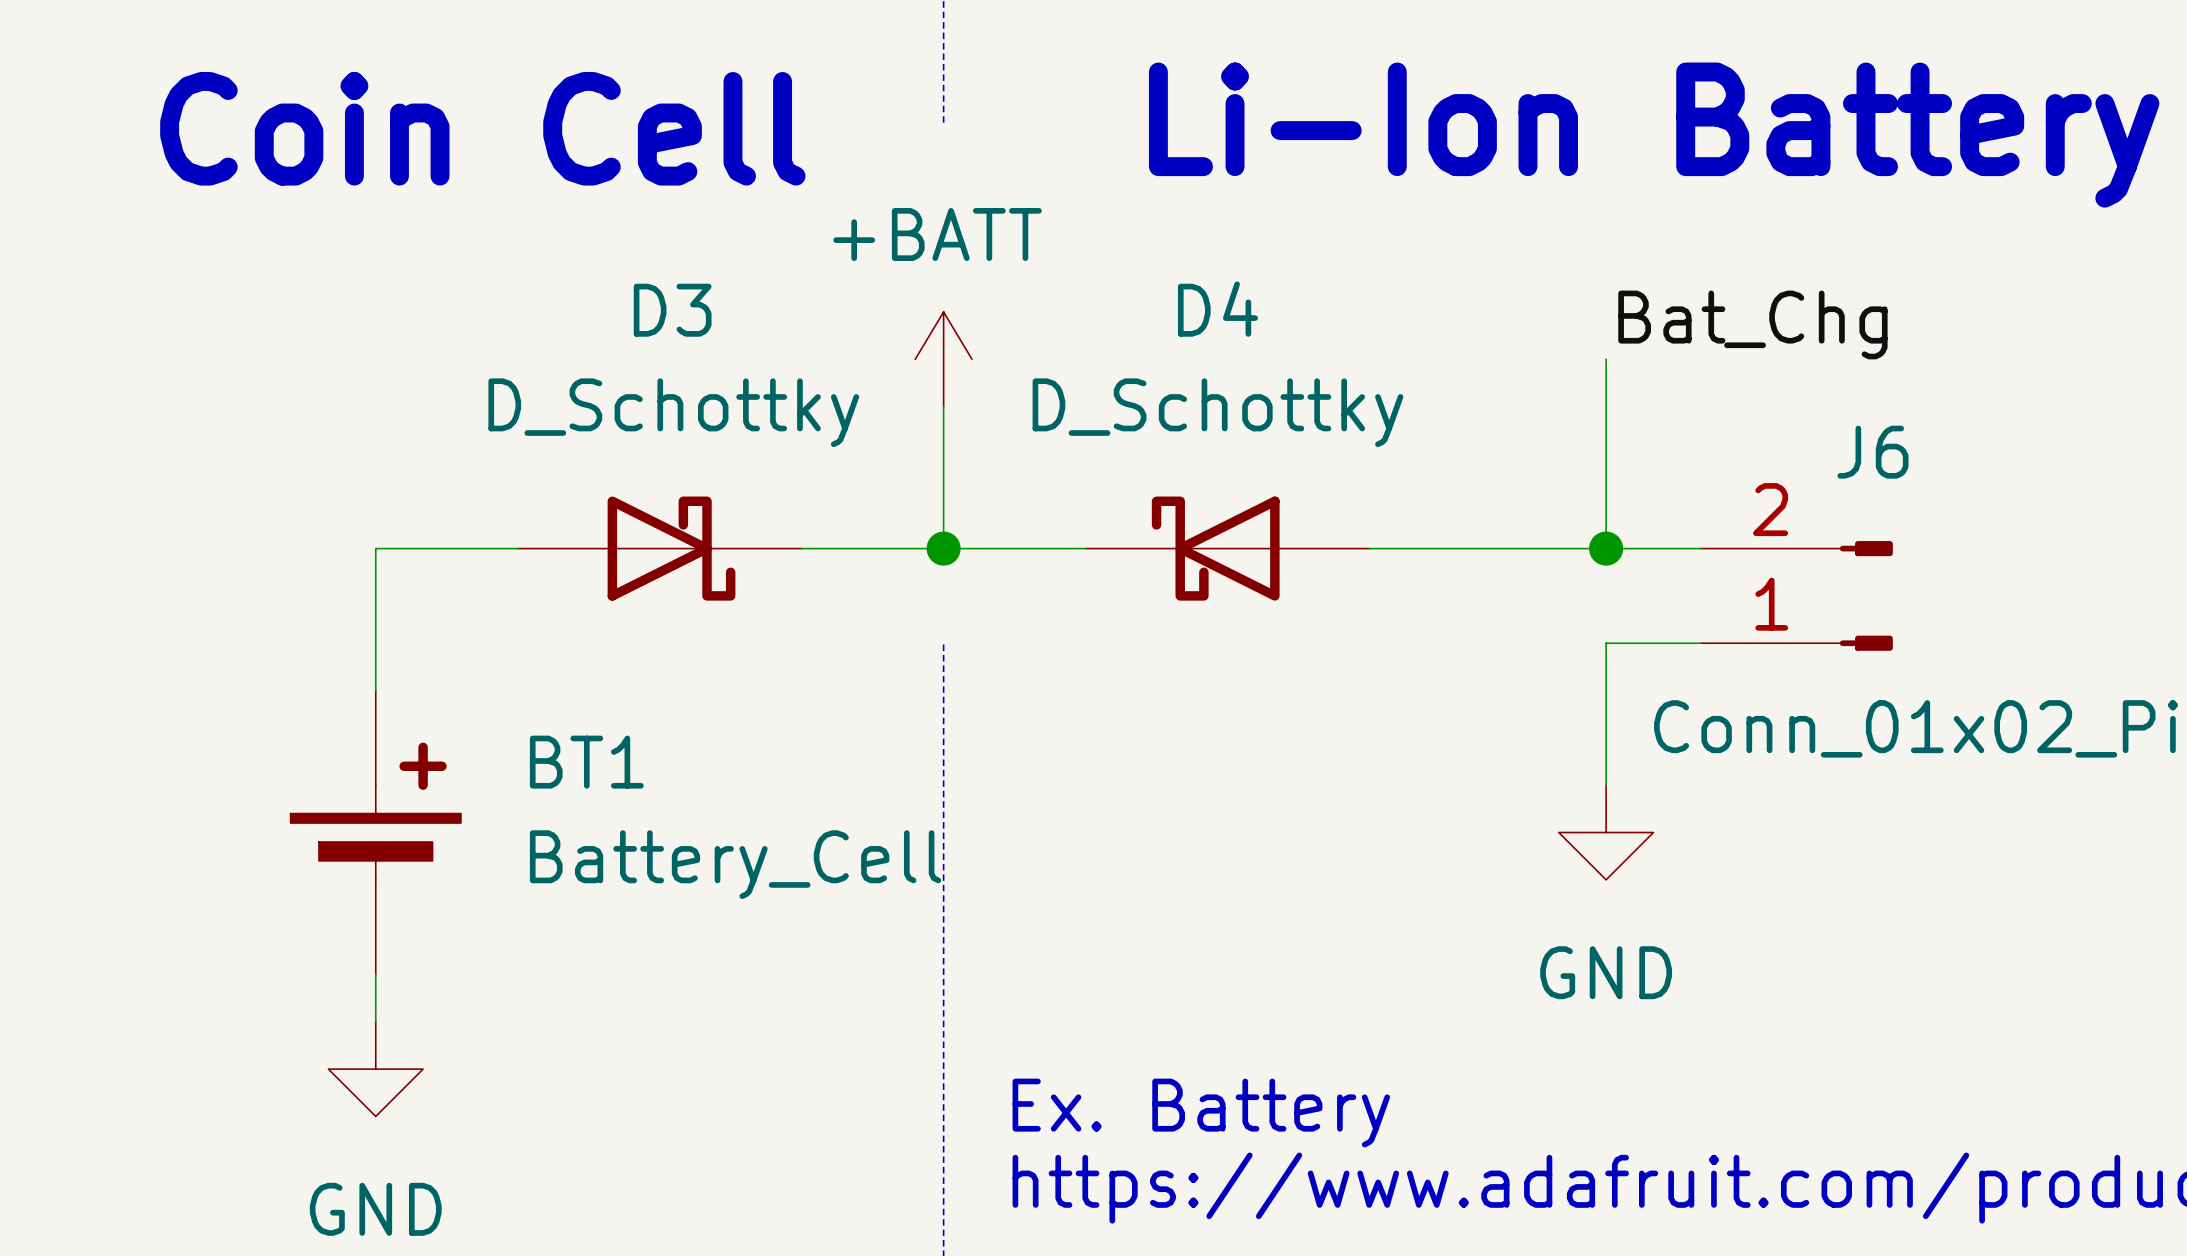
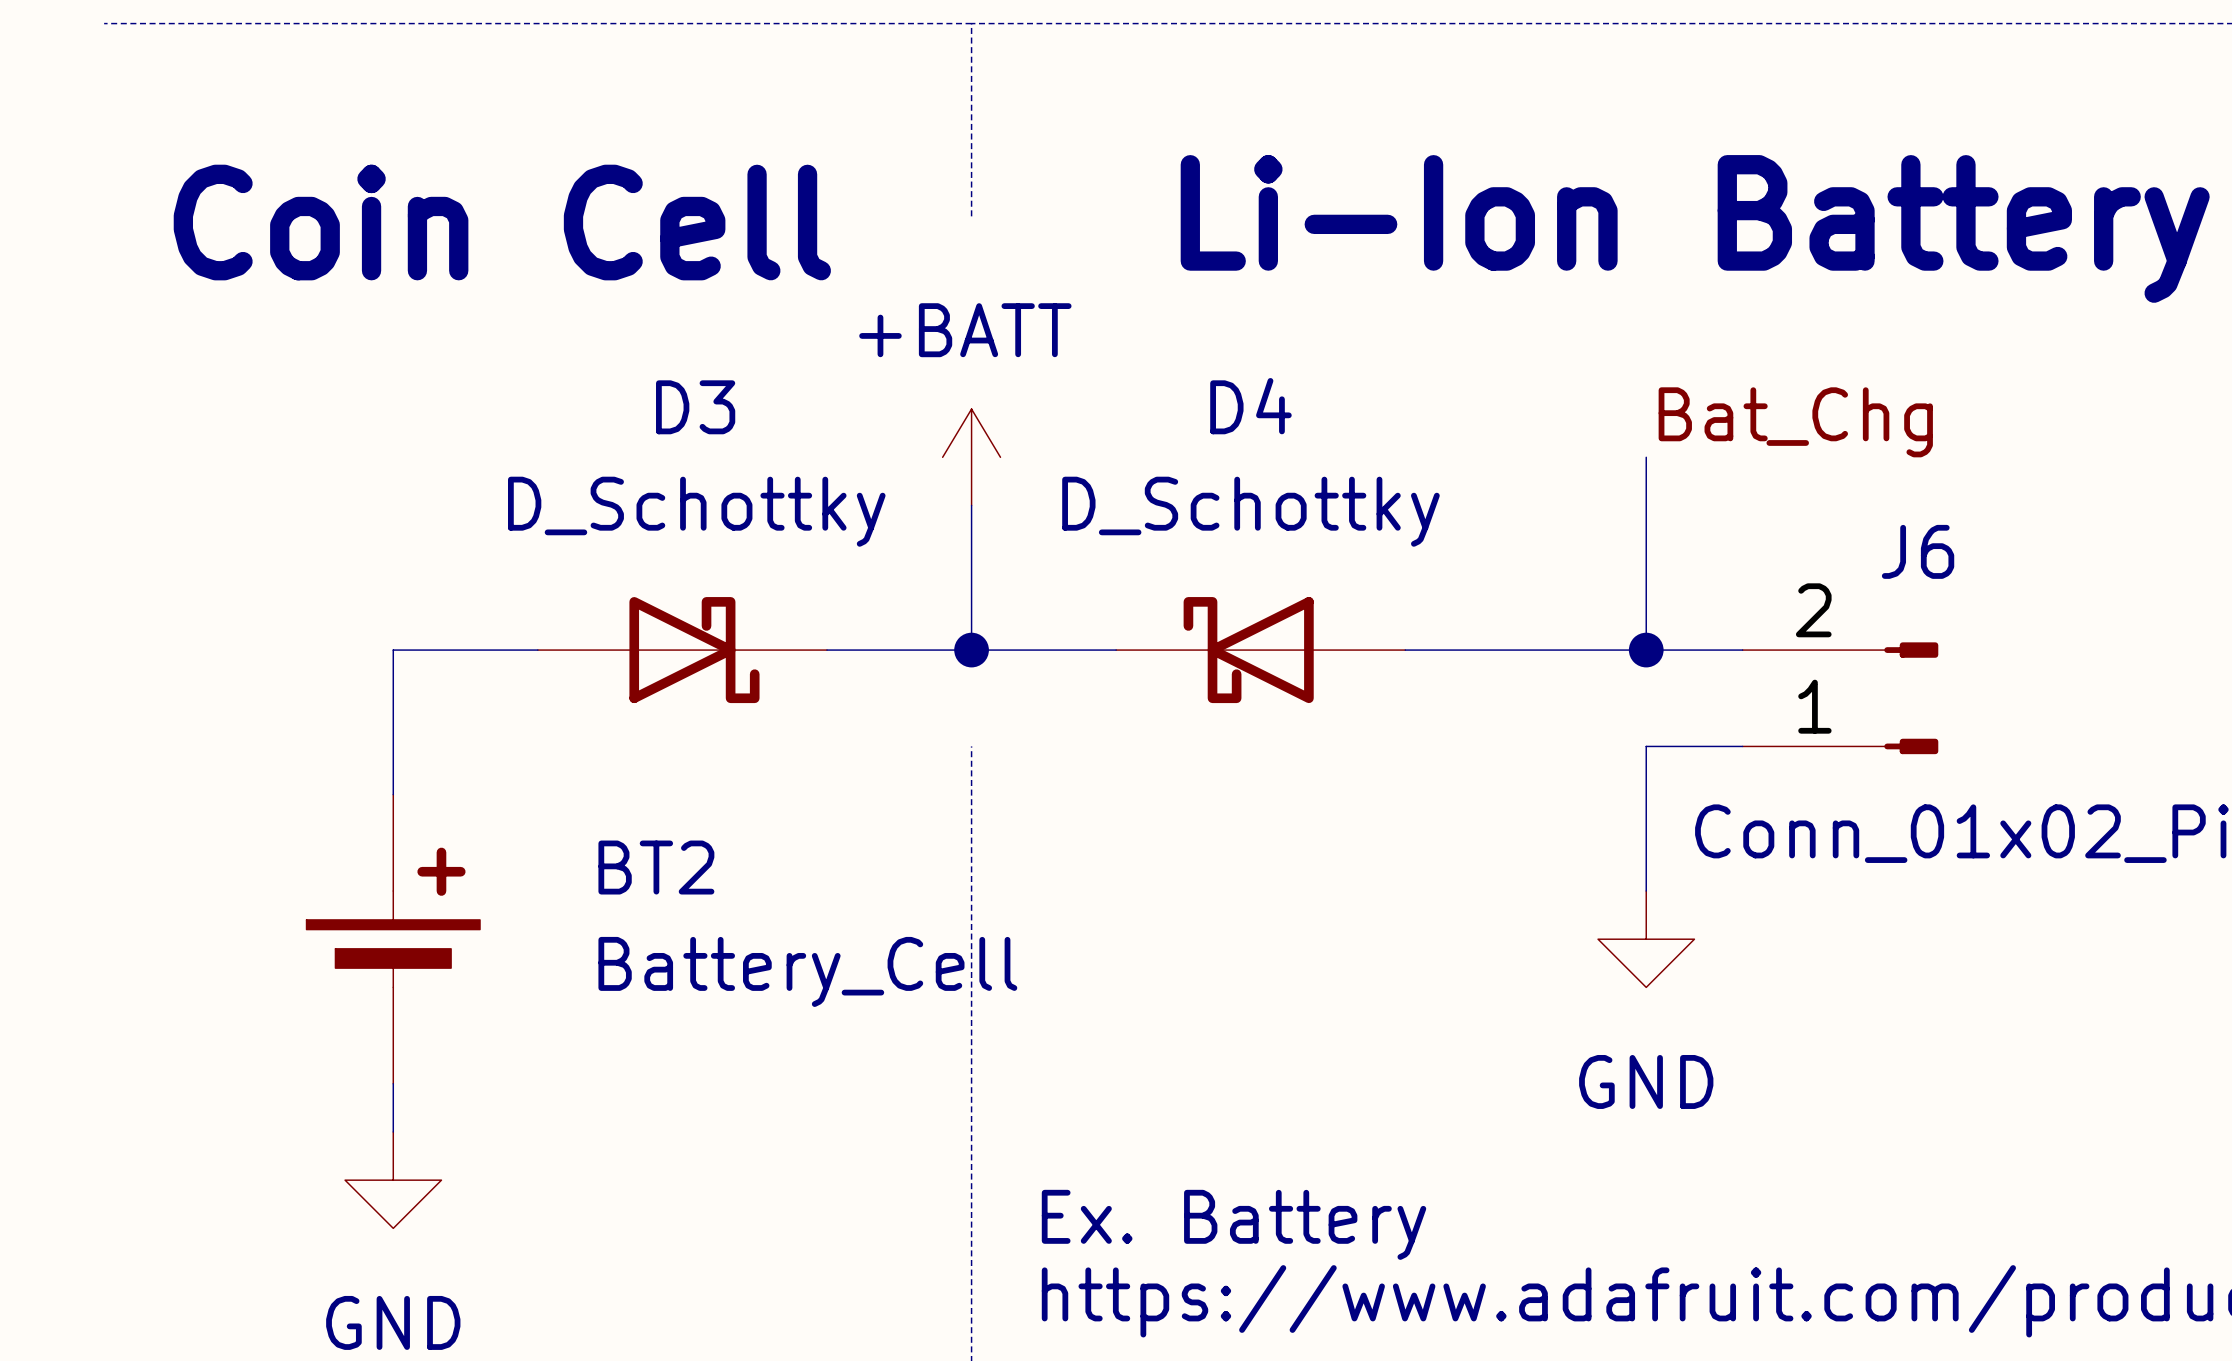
BT1 name: BT1 (586, 762) -> BT2 (656, 867)
BT1 value position: Battery_Cell (735, 864) -> Battery_Cell (807, 971)

